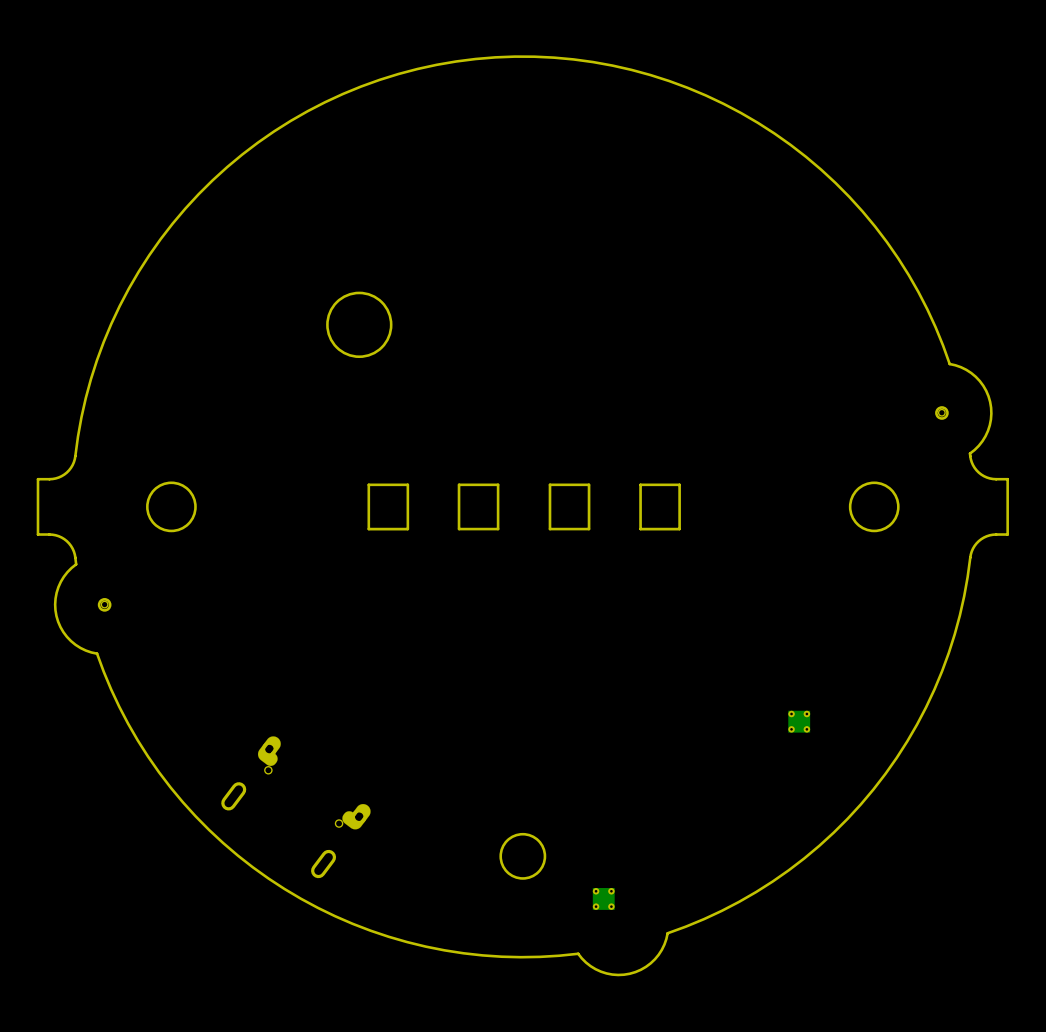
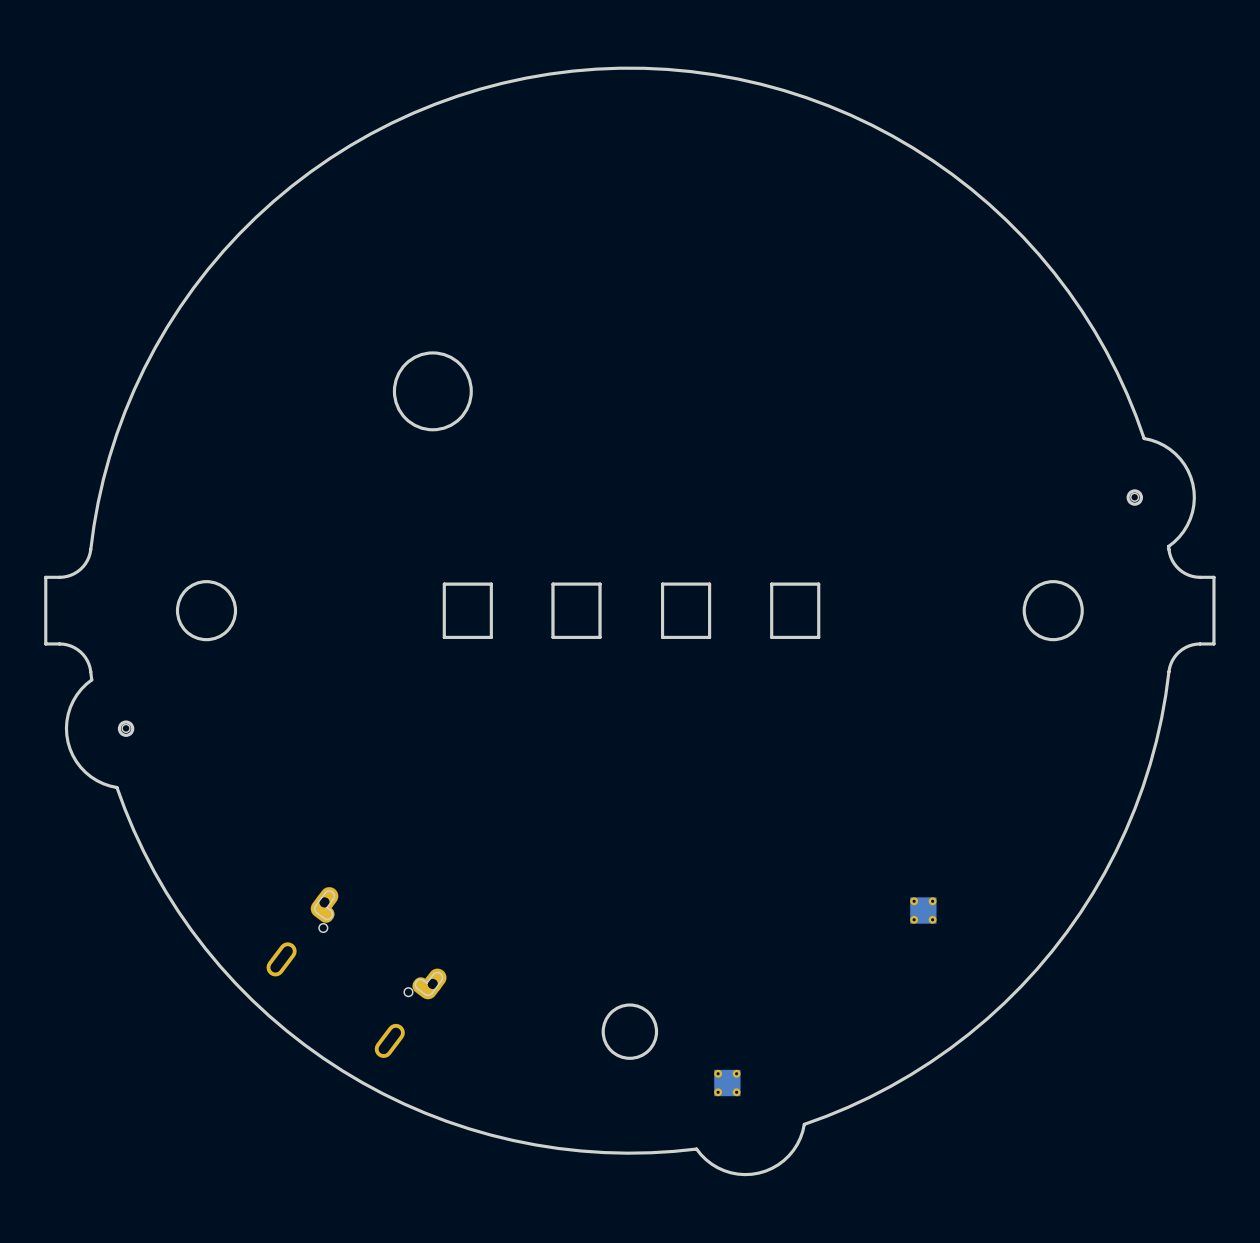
part position: (799, 721) -> (923, 910)

